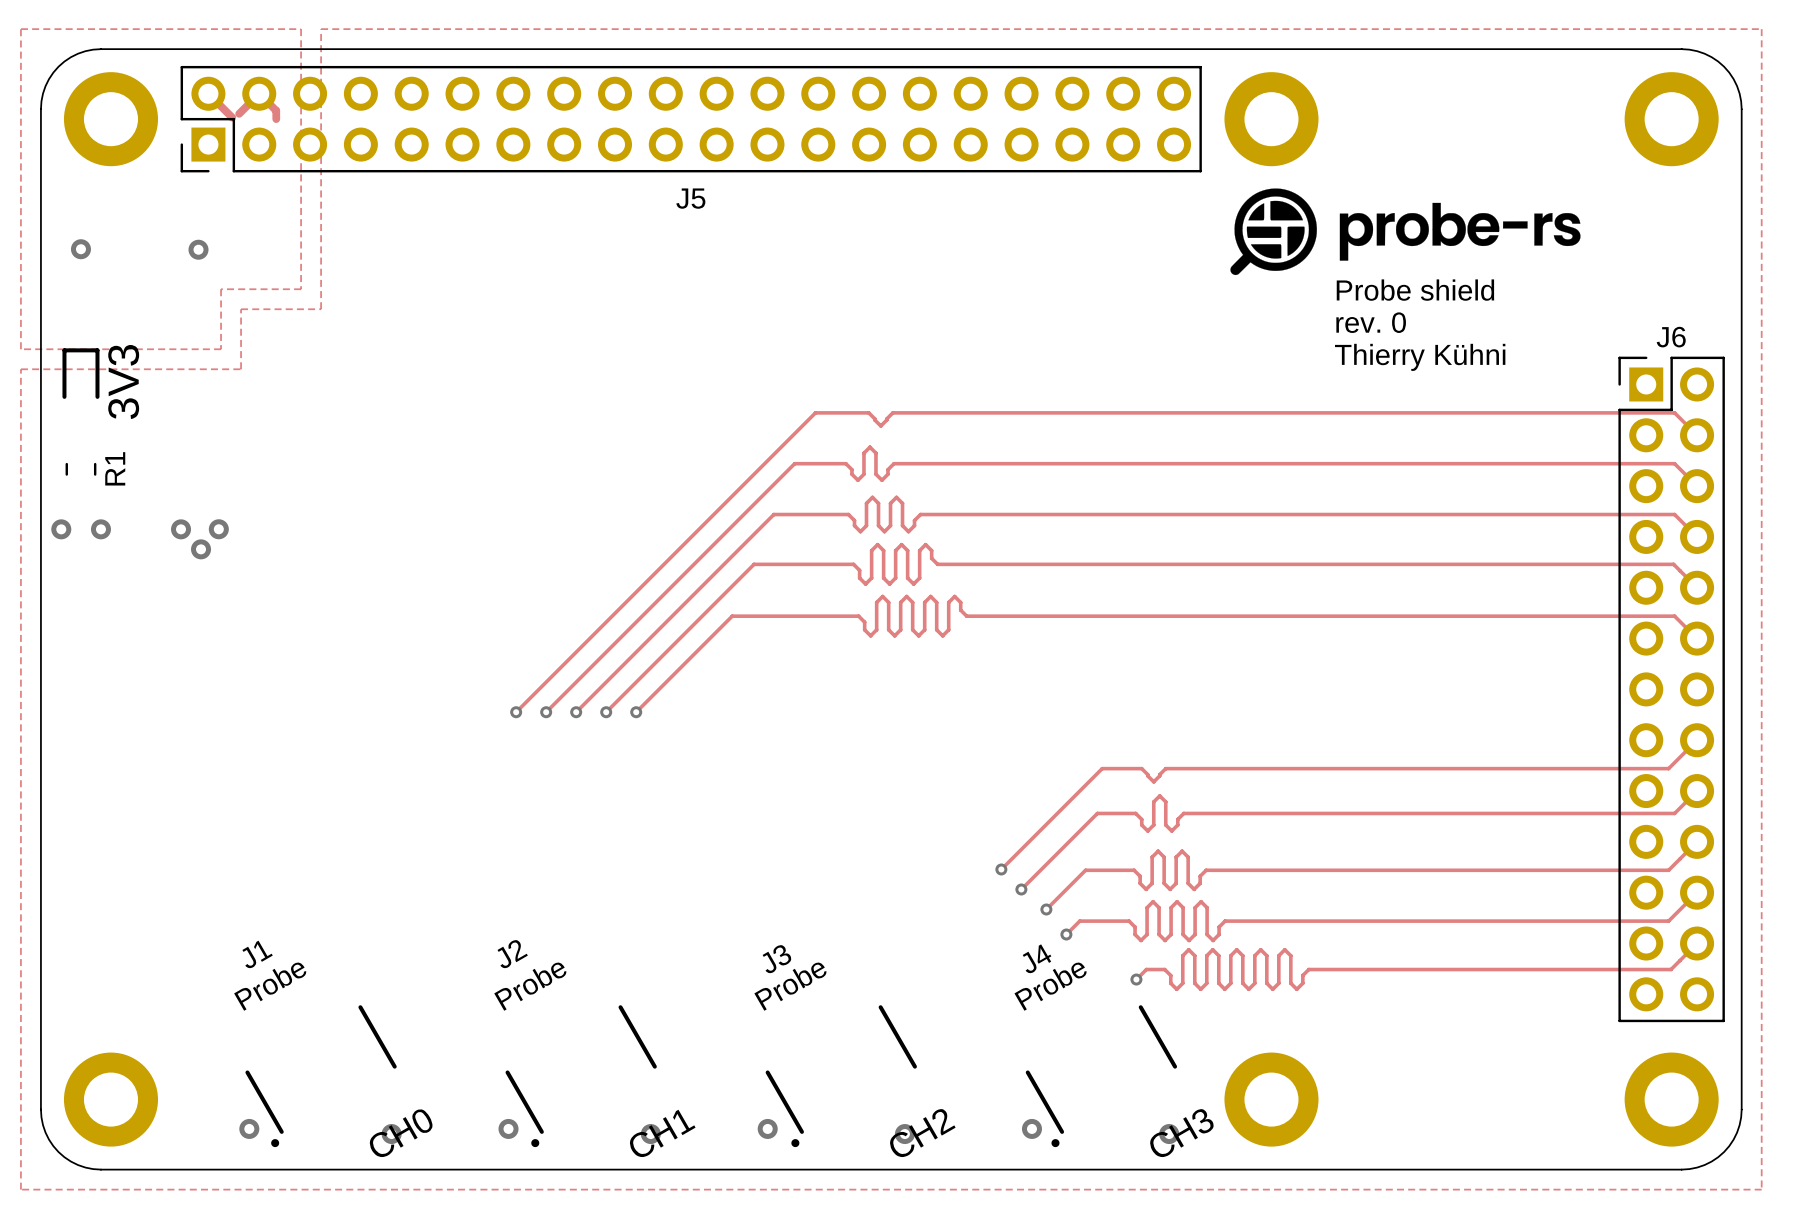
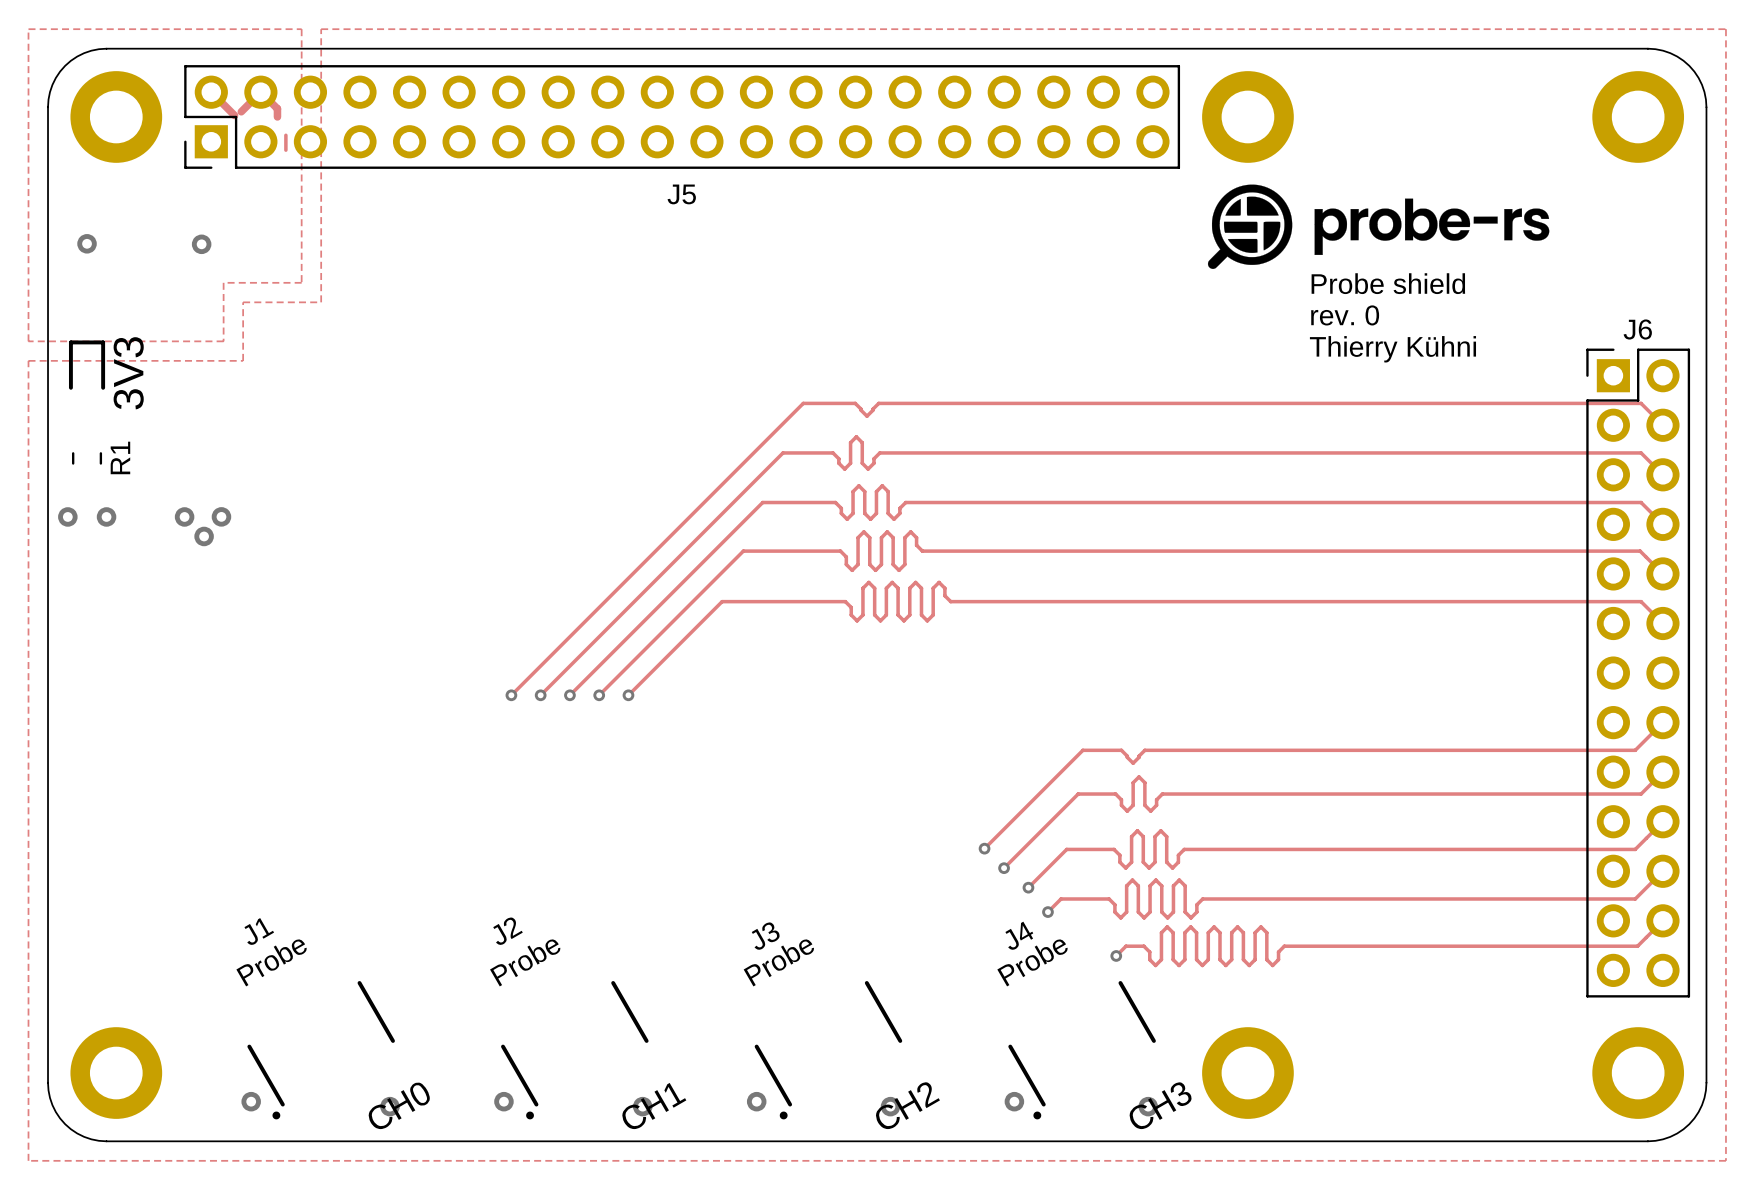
track: none -> (285, 135) (285, 150)

